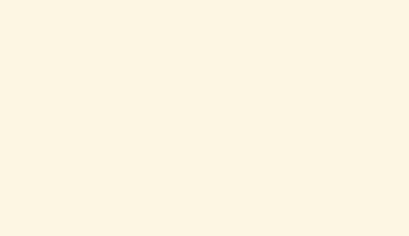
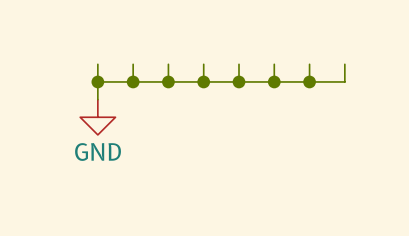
wire: none -> (97, 64) (97, 99)
wire: none -> (133, 64) (133, 81)
wire: none -> (168, 64) (168, 81)
wire: none -> (203, 64) (203, 81)
wire: none -> (239, 64) (239, 81)
wire: none -> (274, 64) (274, 81)
wire: none -> (309, 64) (309, 81)
wire: none -> (344, 64) (344, 81) (97, 81)
junction: none -> (97, 81)
junction: none -> (133, 81)
junction: none -> (168, 81)
junction: none -> (203, 81)
junction: none -> (239, 81)
junction: none -> (274, 81)
junction: none -> (309, 81)
power symbol: none -> GND (97, 117)

